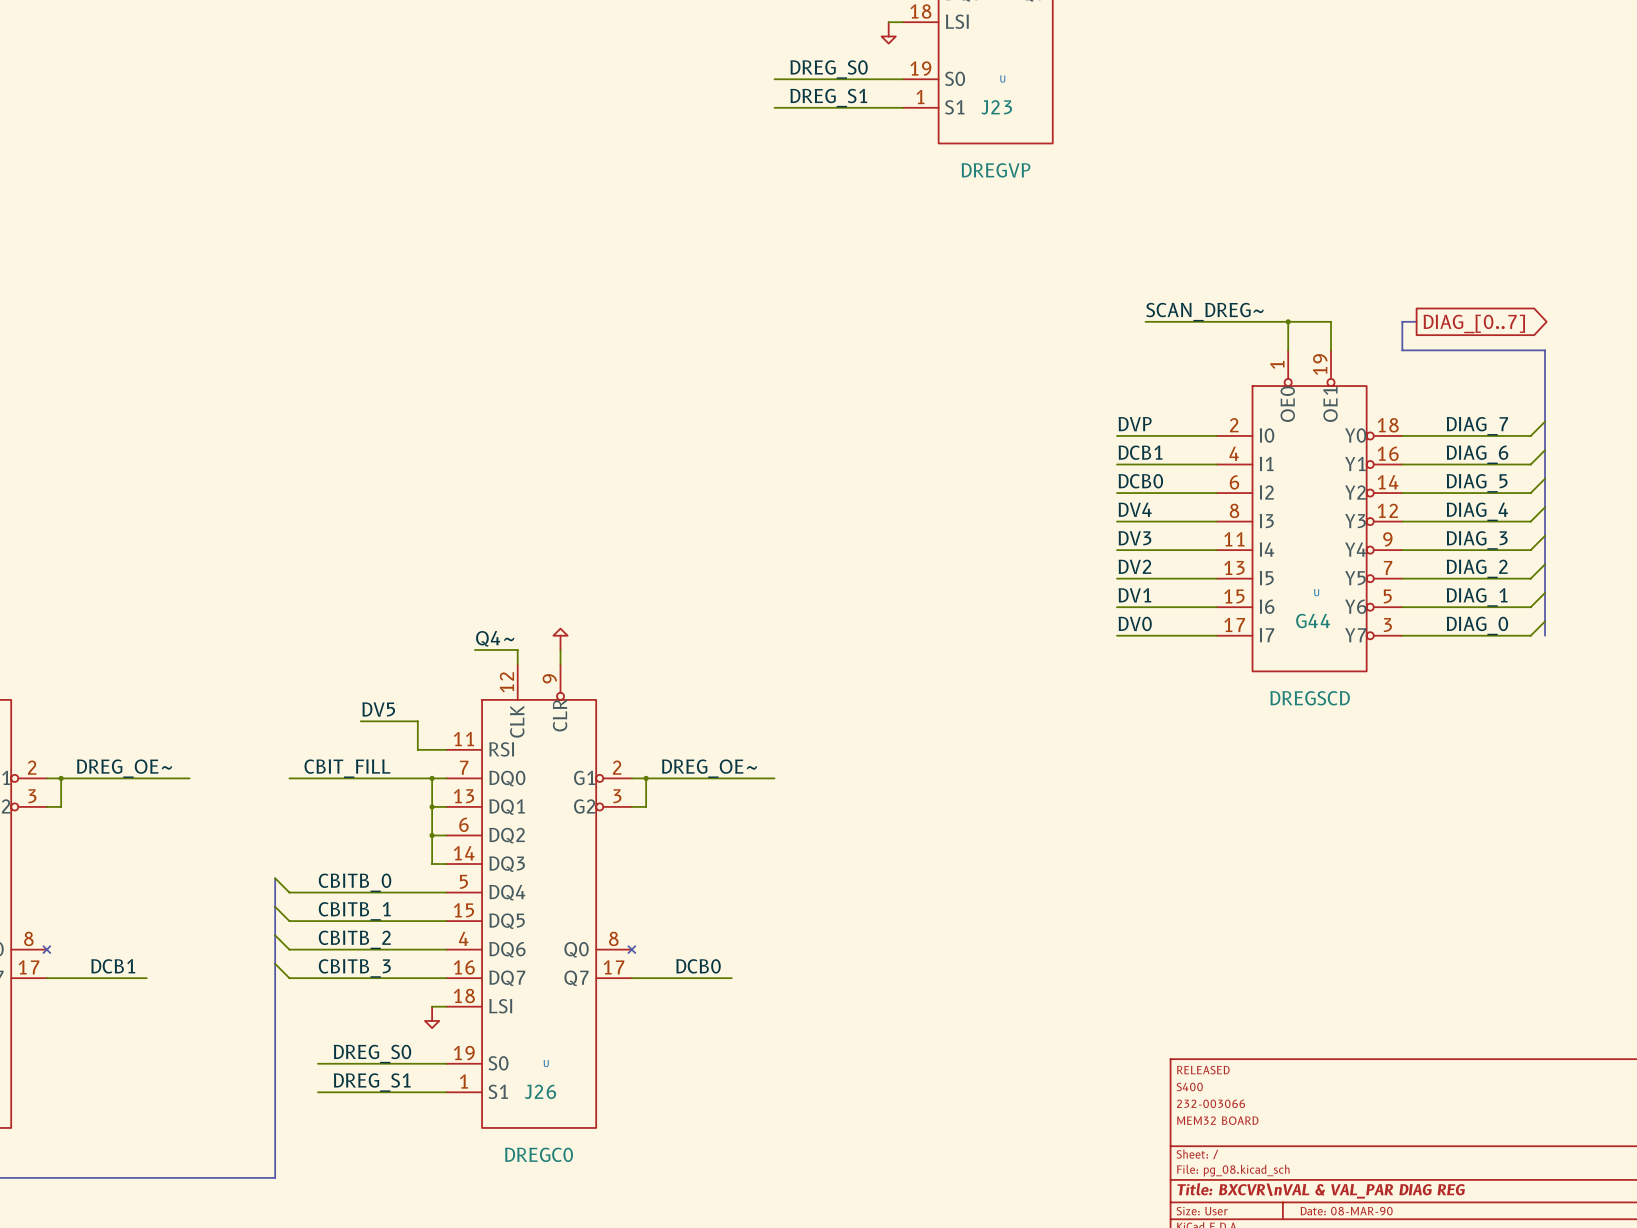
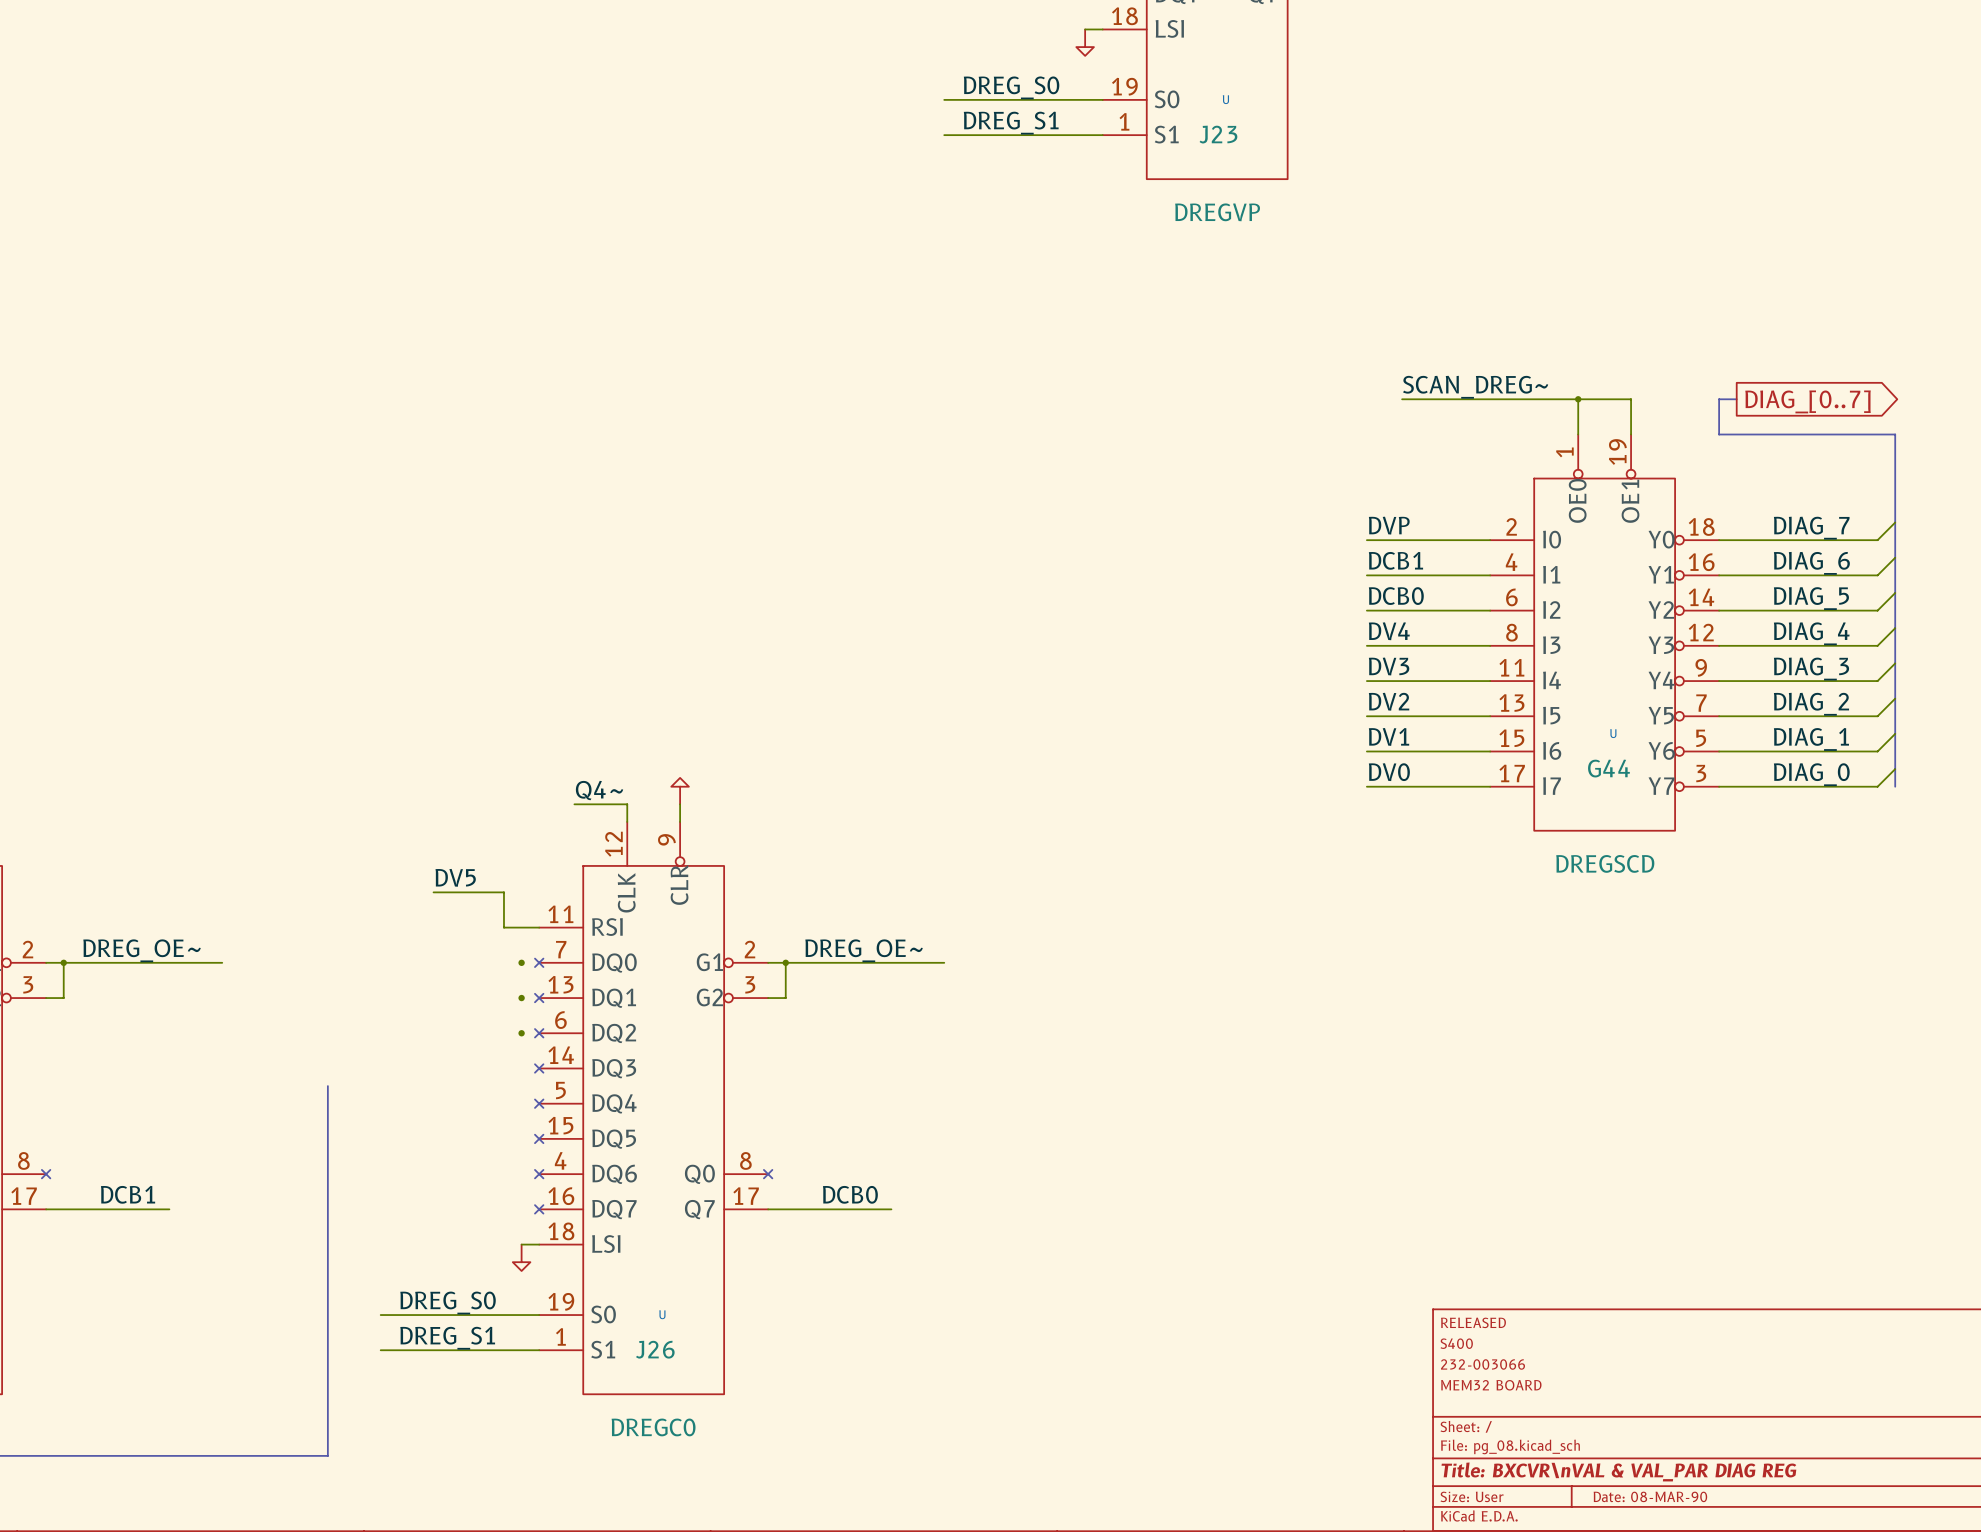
label: CBIT_FILL (347, 768) -> none
wire: (289, 778) (446, 778) -> none
wire: (432, 778) (432, 864) (446, 864) -> none
no-connect mark: none -> (539, 962)
wire: (432, 806) (446, 806) -> none
no-connect mark: none -> (539, 998)
wire: (432, 835) (446, 835) -> none
no-connect mark: none -> (539, 1033)
no-connect mark: none -> (539, 1068)
wire: (275, 878) (289, 892) (446, 892) -> none
label: CBITB_0 (355, 882) -> none
no-connect mark: none -> (539, 1103)
wire: (275, 906) (289, 921) (446, 921) -> none
label: CBITB_1 (354, 911) -> none
no-connect mark: none -> (539, 1138)
wire: (275, 935) (289, 949) (446, 949) -> none
label: CBITB_2 (354, 939) -> none
no-connect mark: none -> (539, 1174)
wire: (275, 963) (289, 978) (446, 978) -> none
label: CBITB_3 (354, 968) -> none
no-connect mark: none -> (539, 1209)

